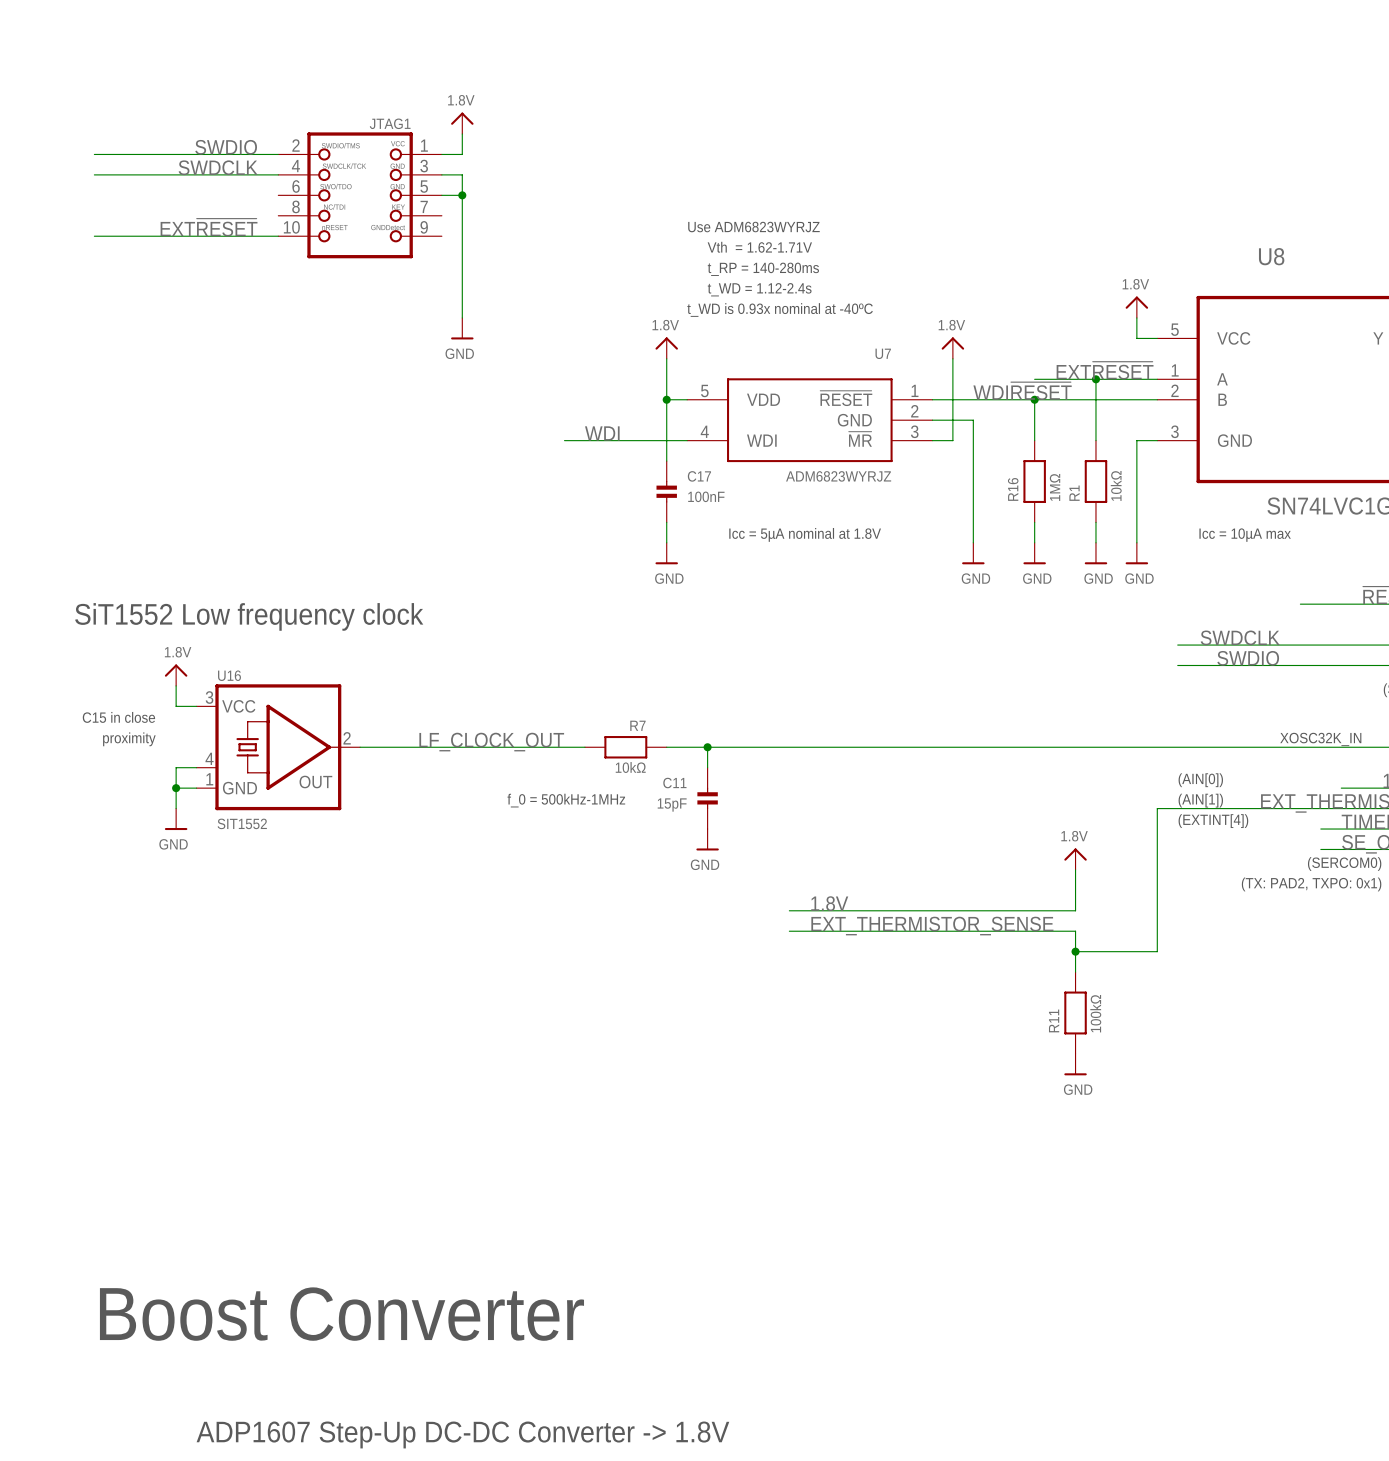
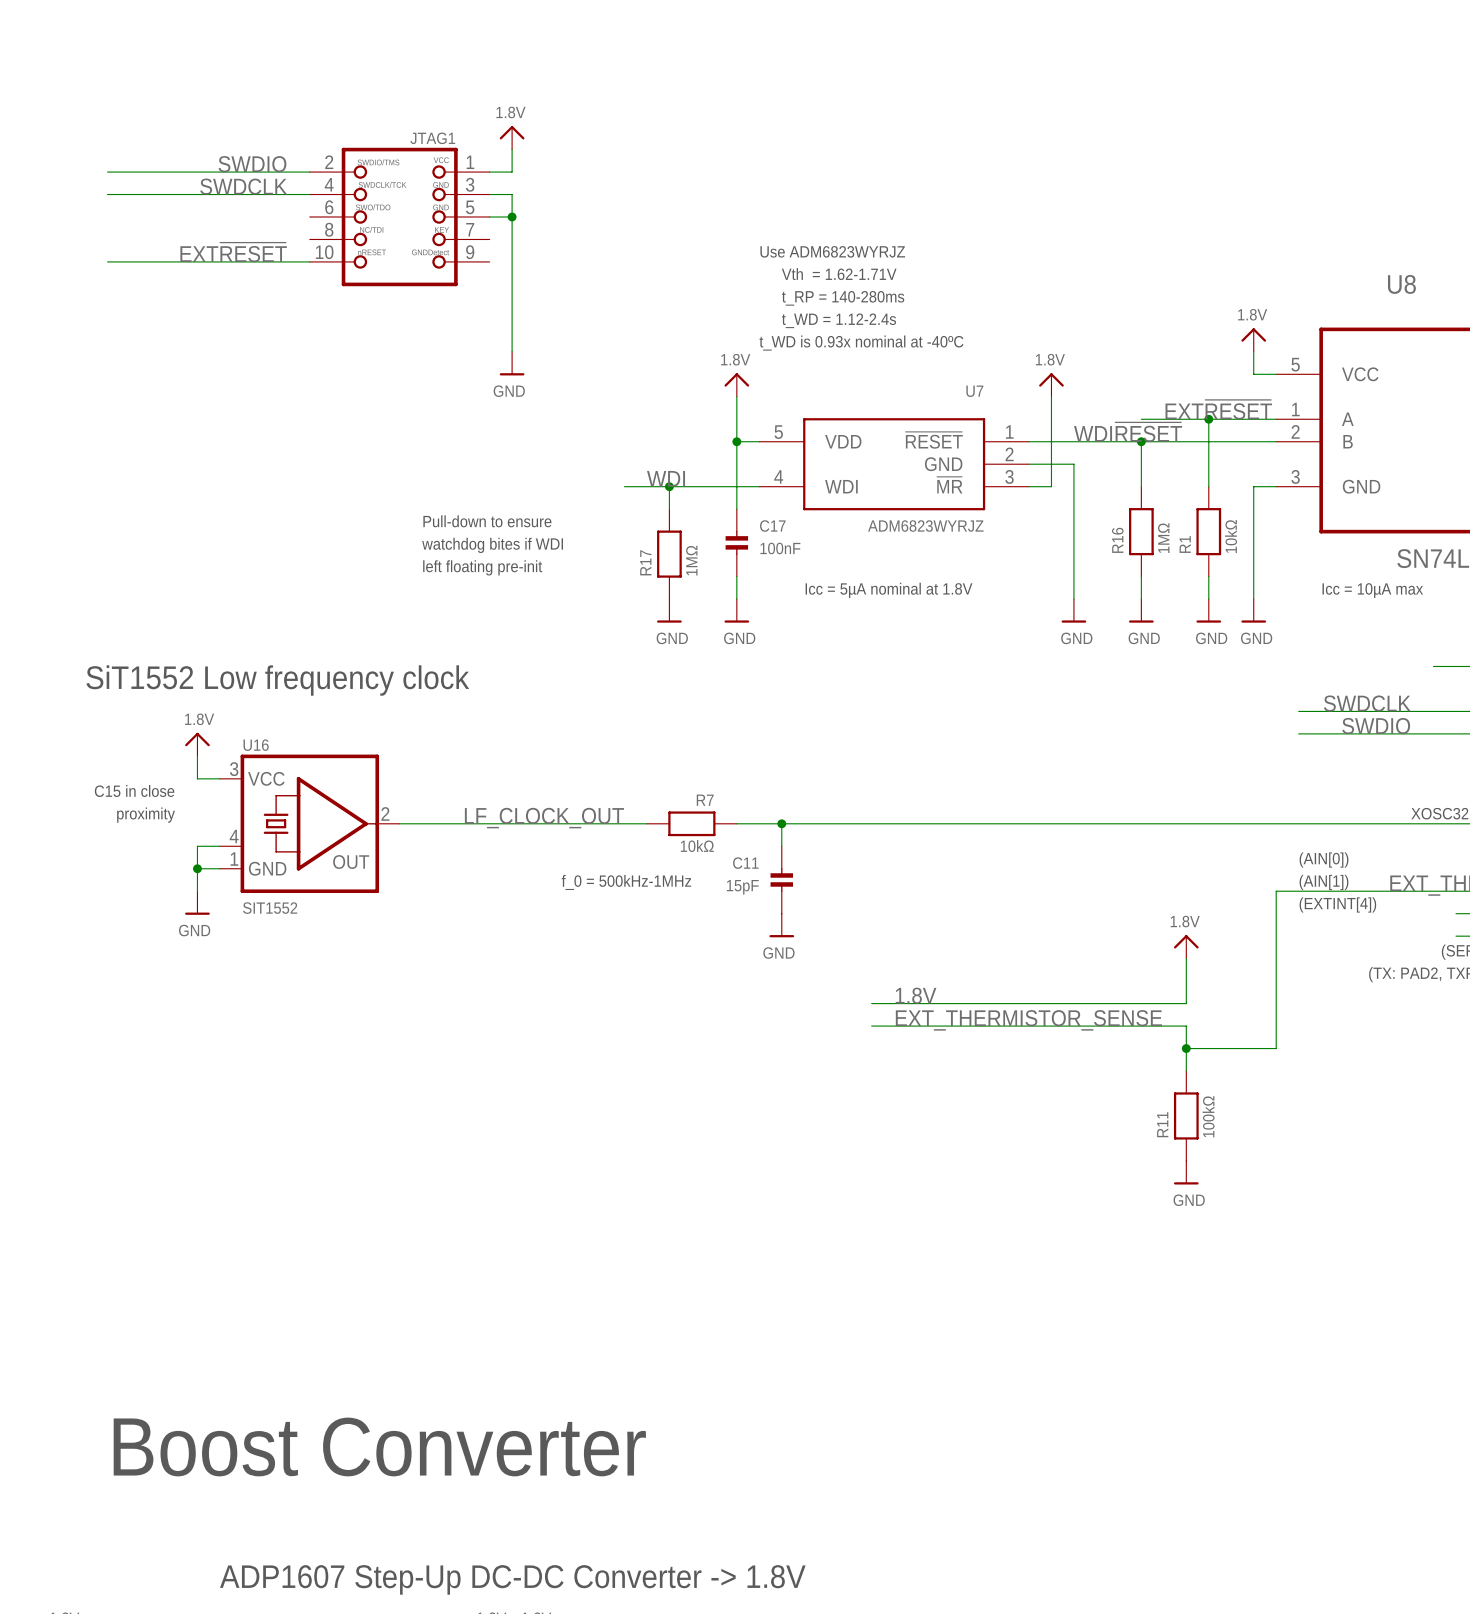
wire: none -> (669, 486) (669, 509)
junction: none -> (669, 486)
text: none -> Pull-down to ensure (487, 521)
text: none -> watchdog bites if WDI (492, 545)
R17: none -> 1MΩ (669, 554)
text: none -> left floating pre-init (482, 567)
power symbol: none -> GND (669, 610)

